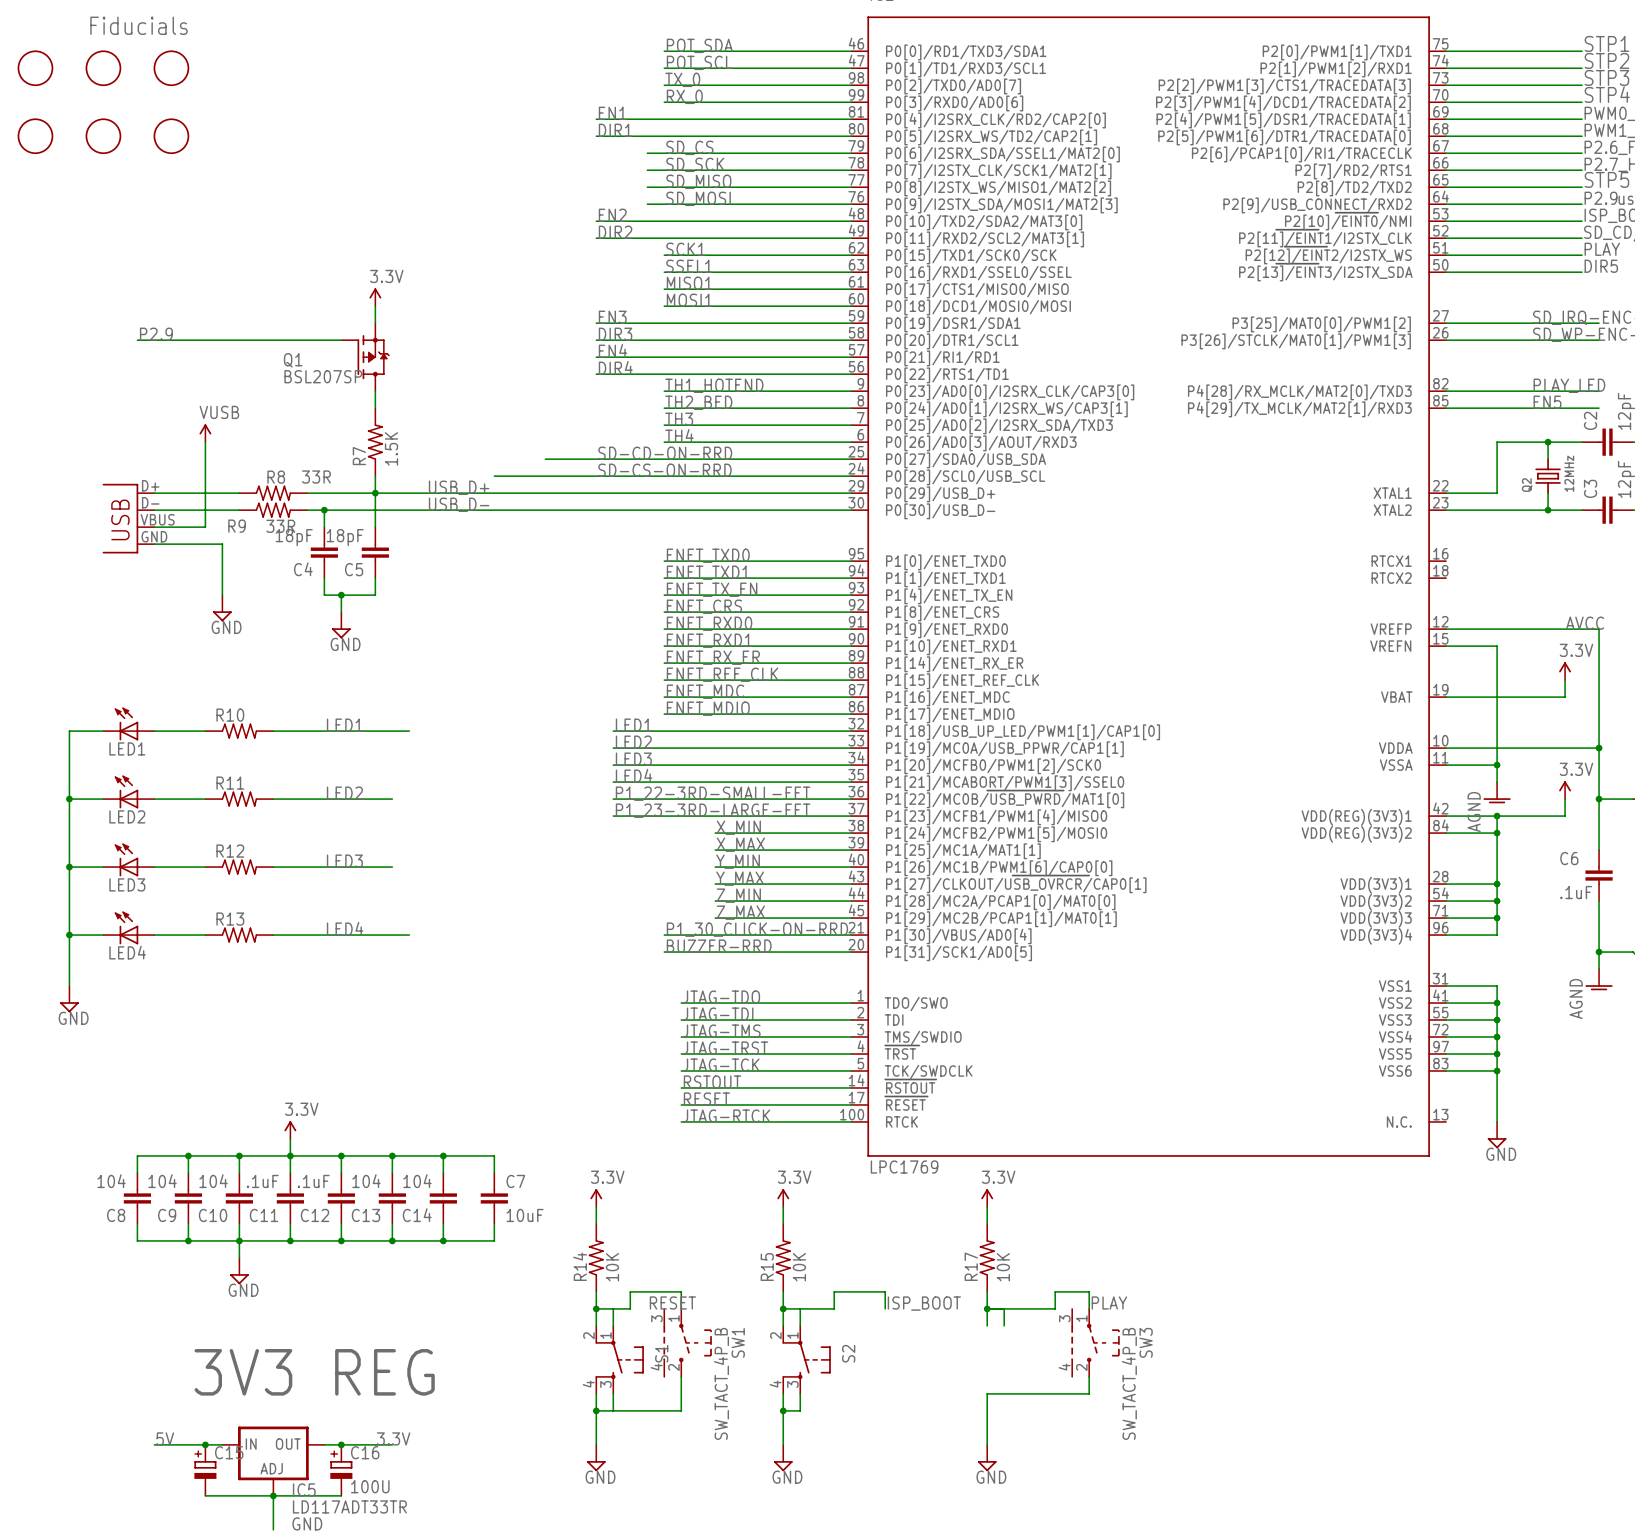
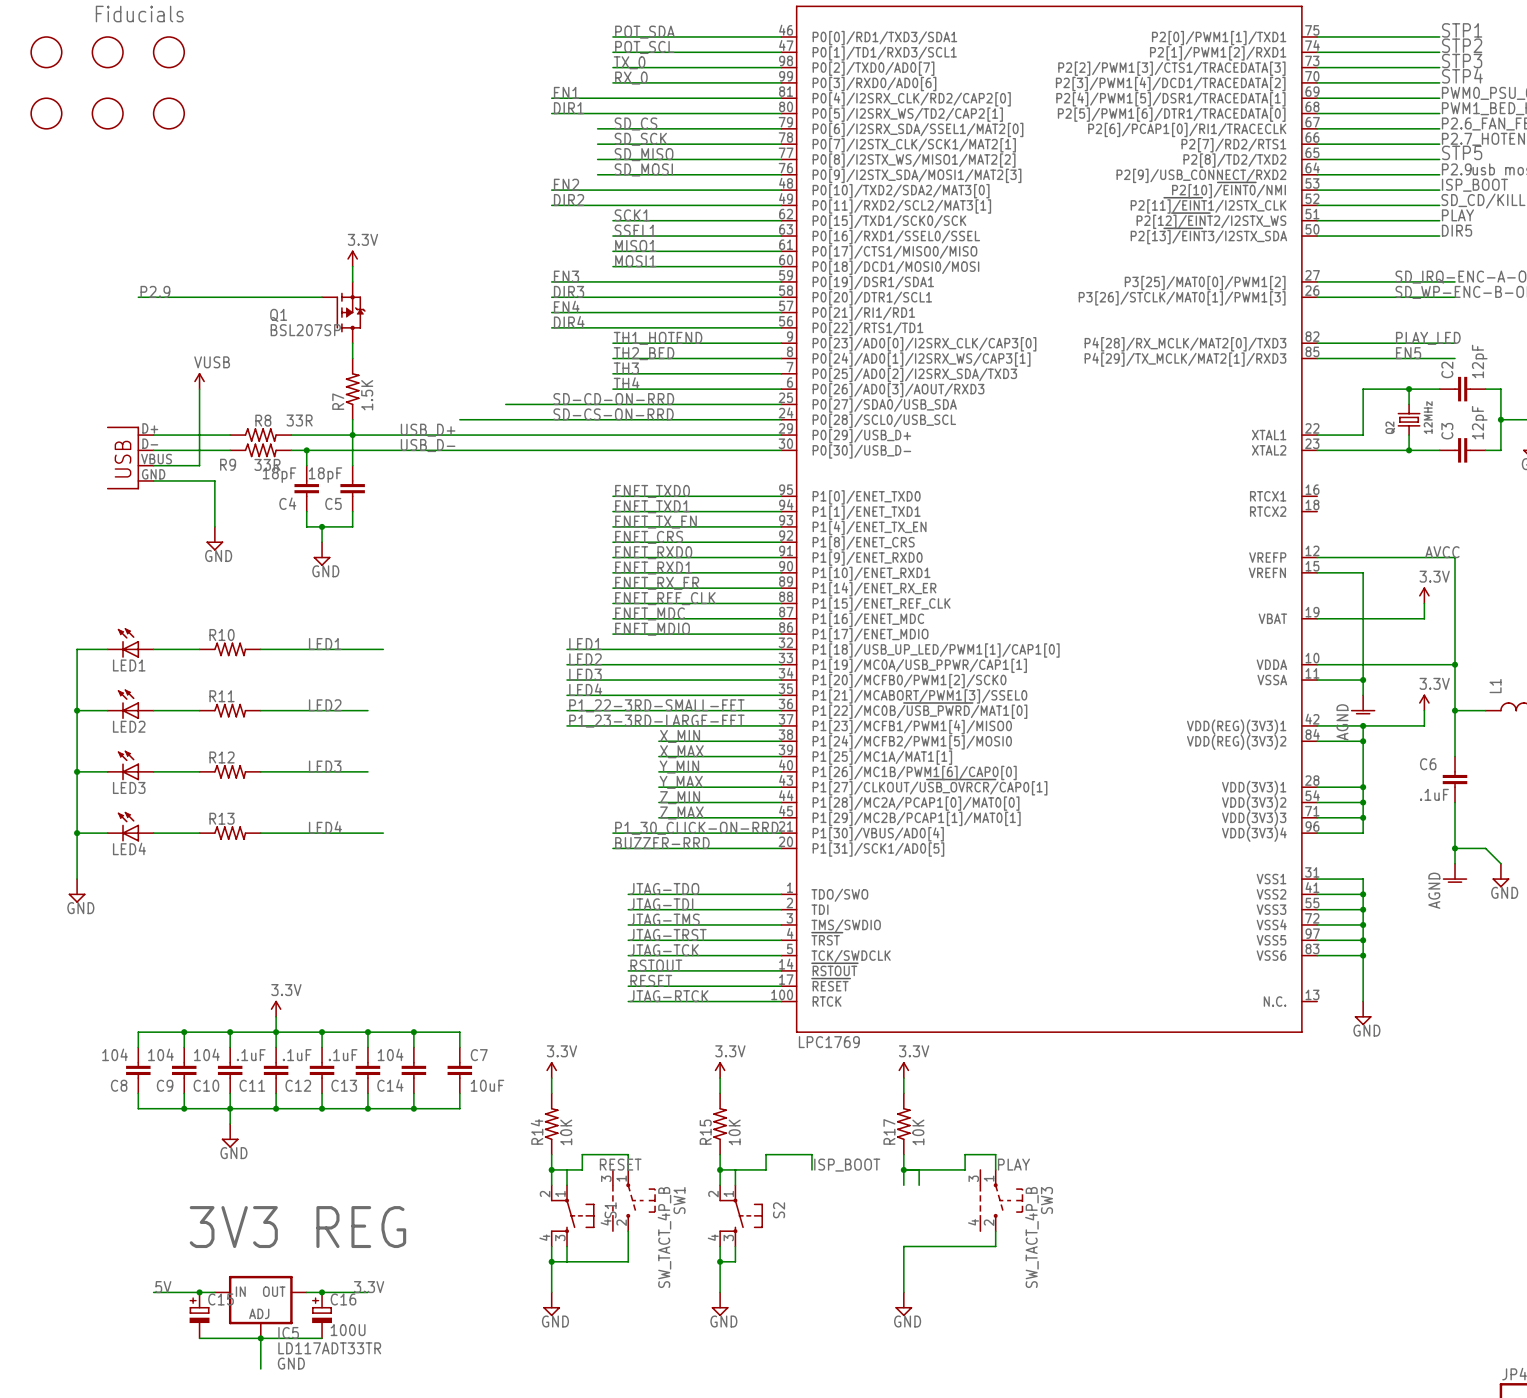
C13 value: 104 (366, 1181) -> .1uF (343, 1055)

